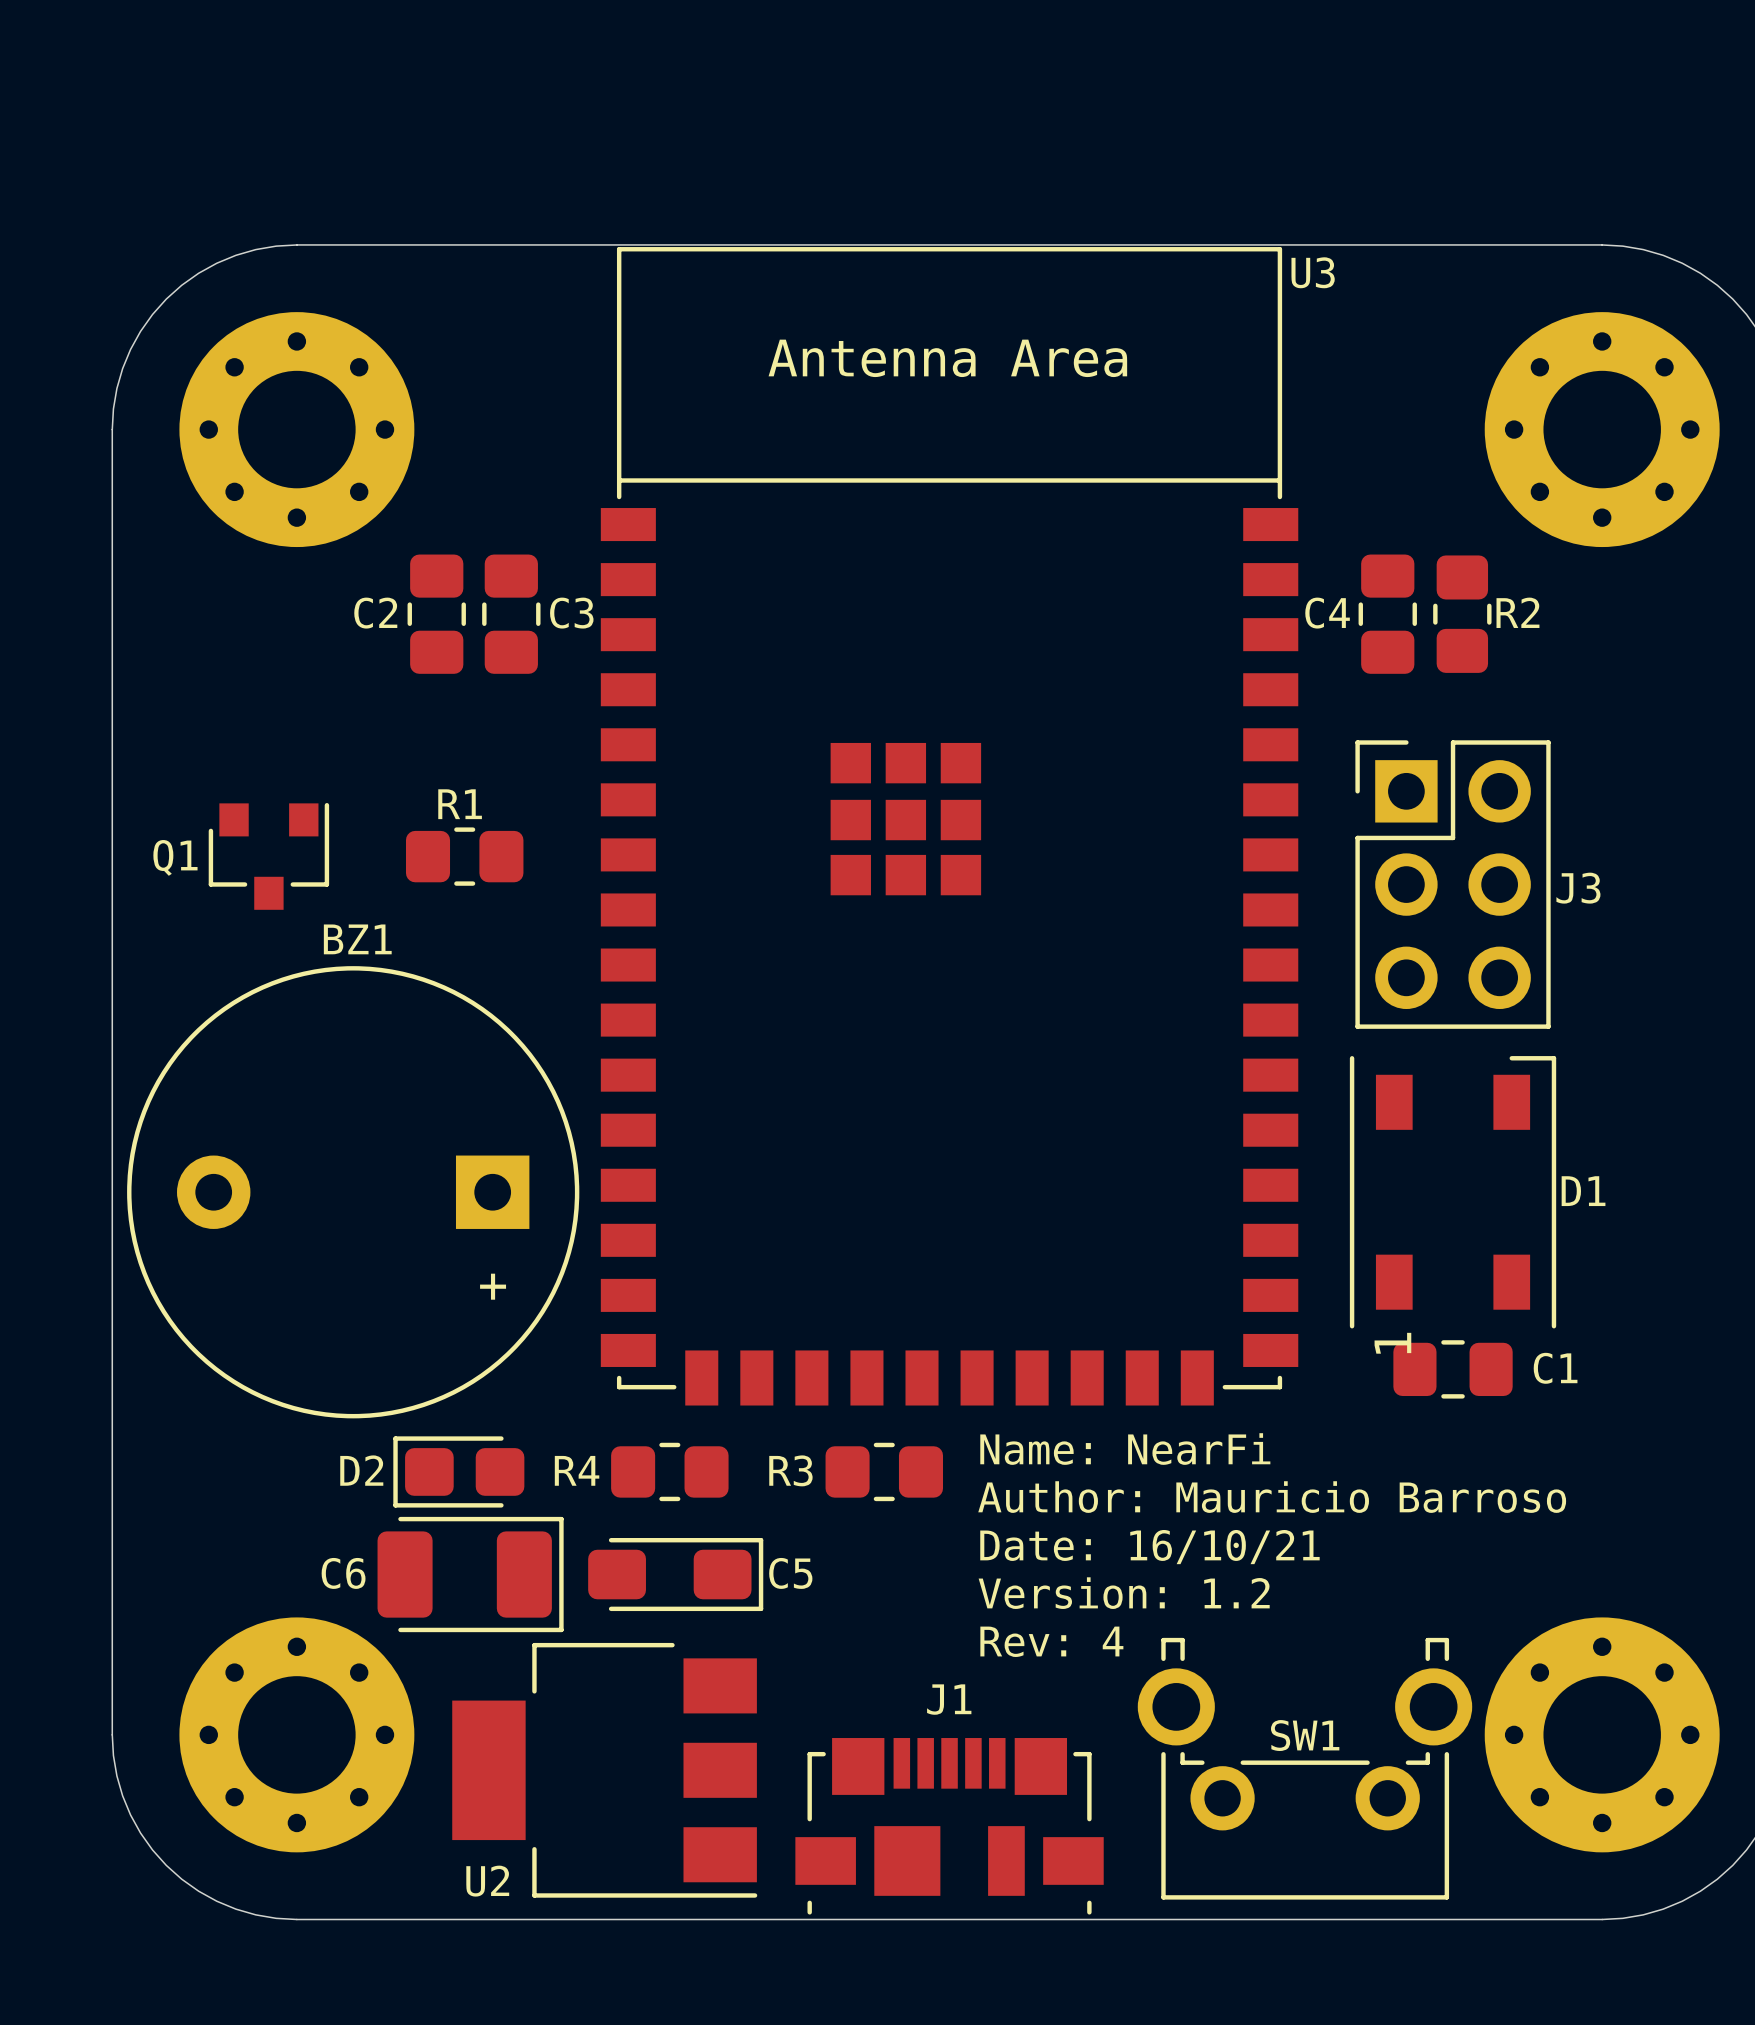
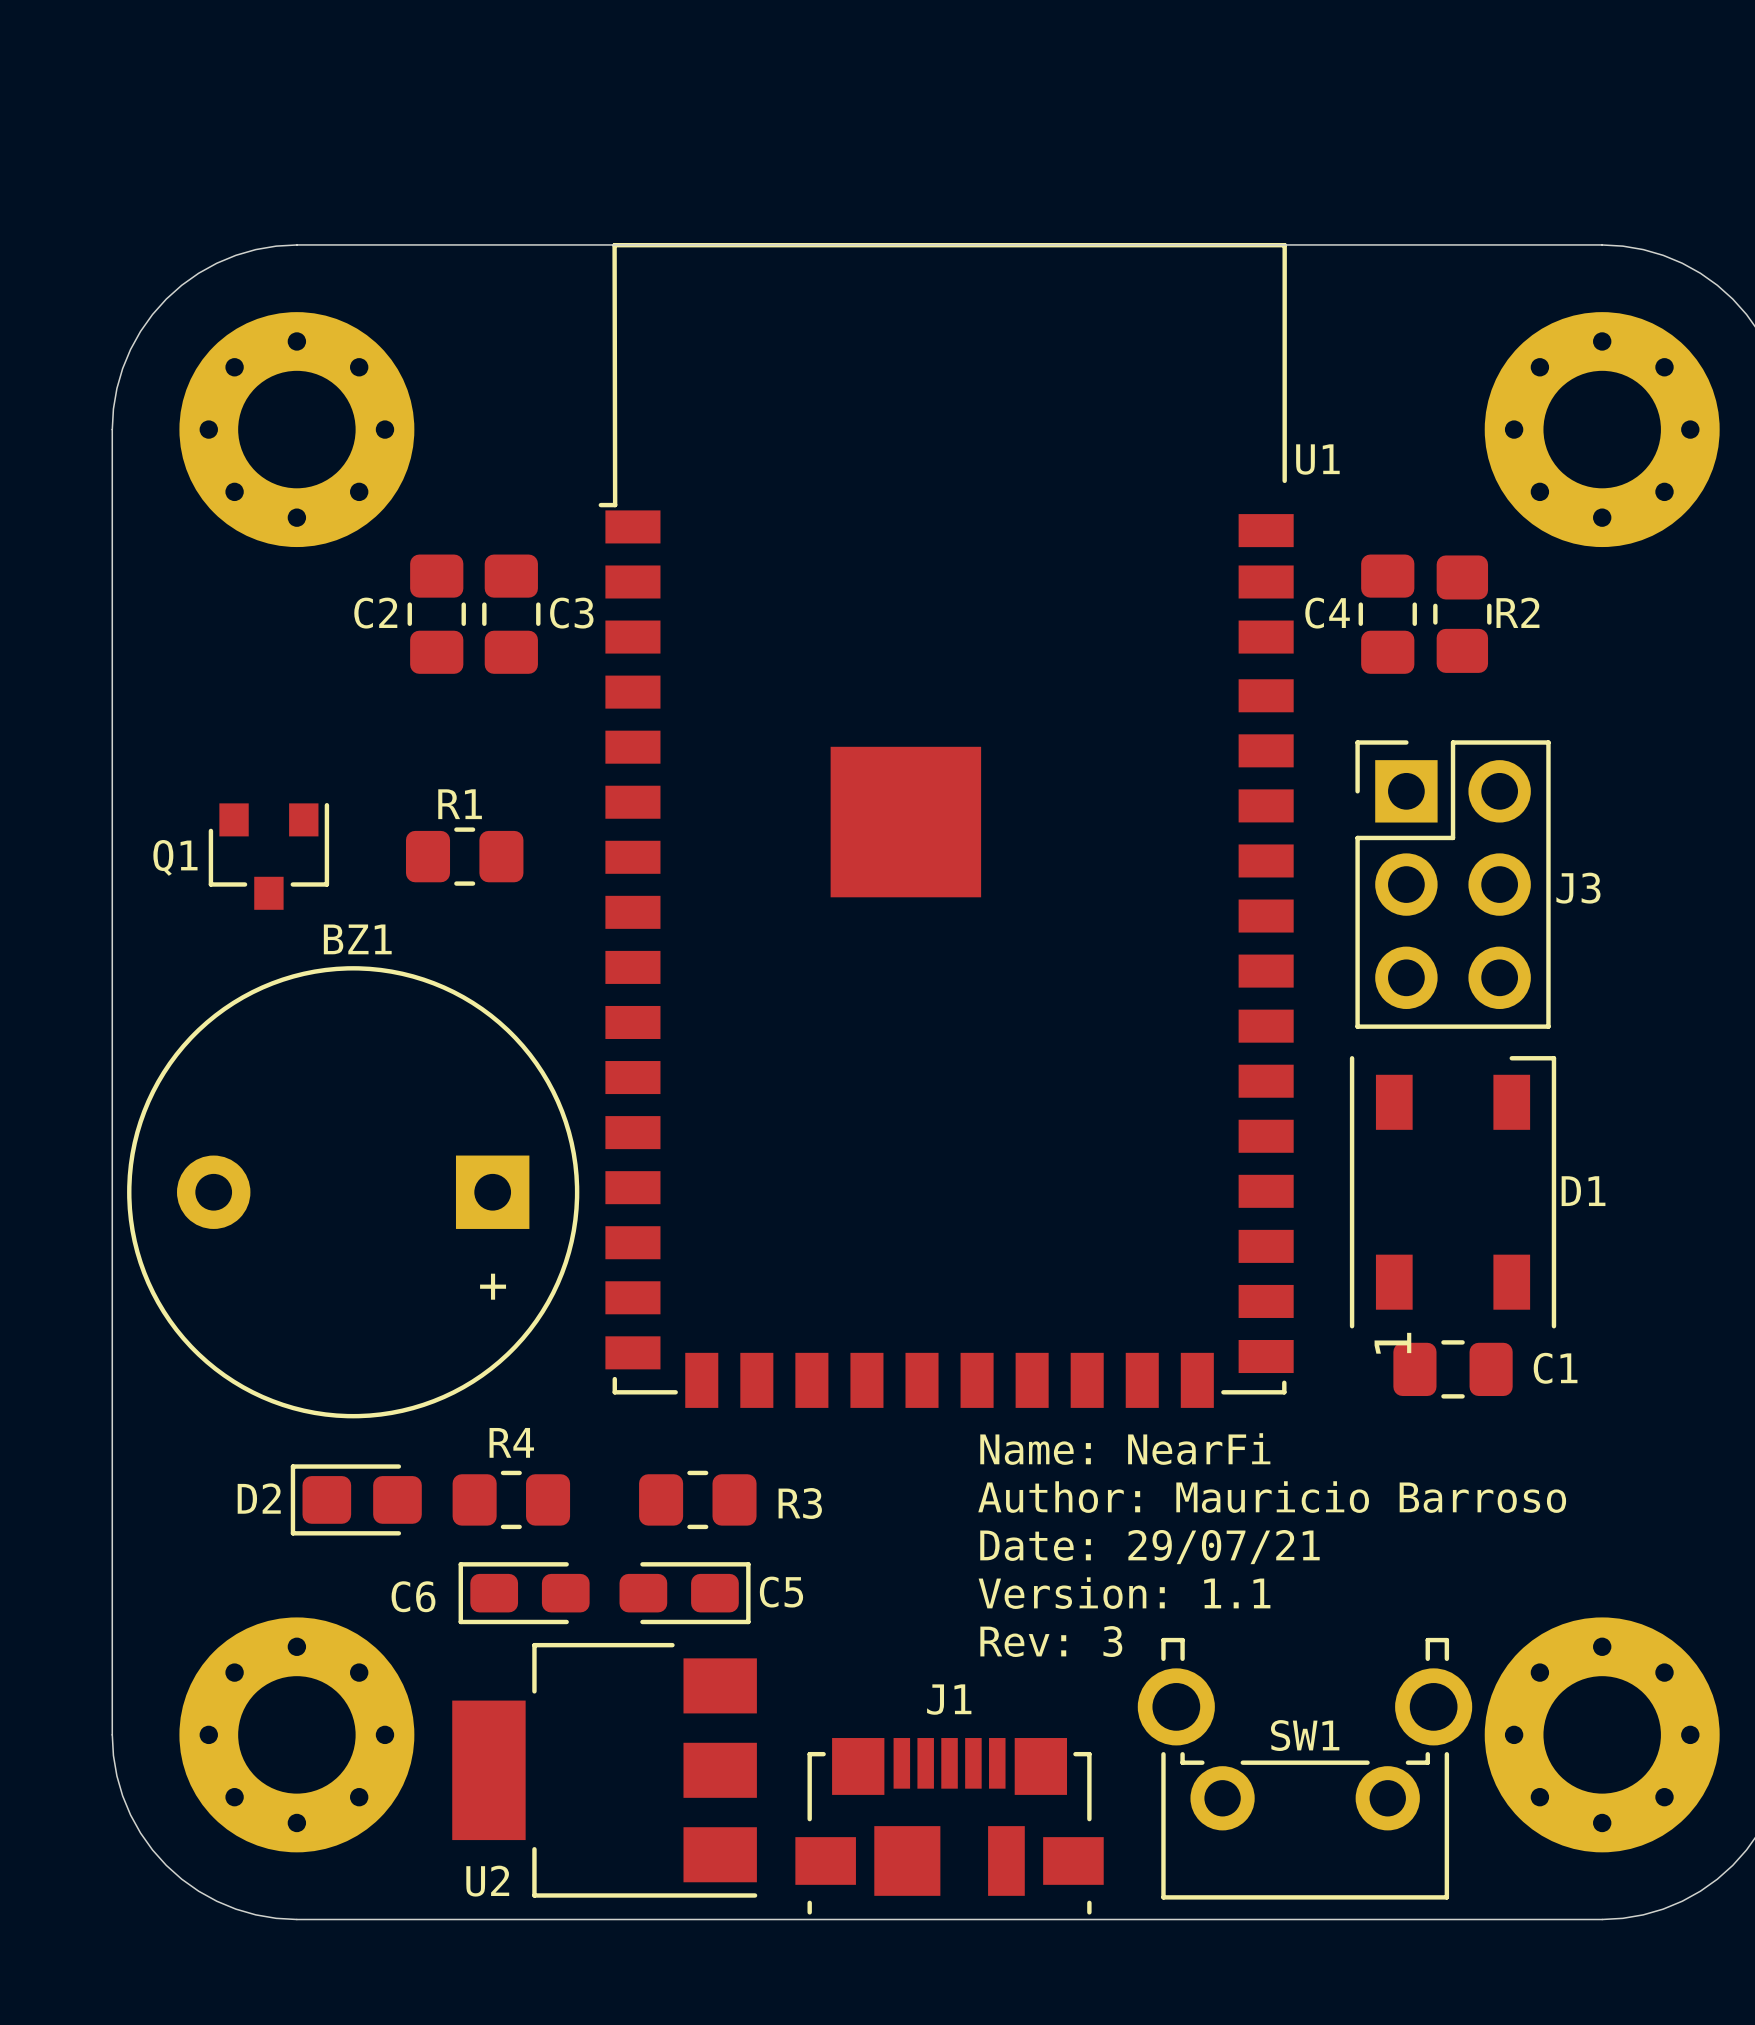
U1: none -> (946, 825)
U3: (949, 826) -> none
R4 name position: R4 (577, 1470) -> R4 (511, 1442)
R3 name position: R3 (790, 1470) -> R3 (800, 1503)
D2 position: (458, 1471) -> (356, 1499)
R4 position: (669, 1471) -> (511, 1499)
R3 position: (884, 1471) -> (697, 1499)
C6 footprint: [377, 1516, 564, 1633] -> [458, 1562, 590, 1625]
C5 footprint: [588, 1538, 764, 1612] -> [619, 1562, 751, 1625]
text: Date: 16/10/21 (1149, 1547) -> Date: 29/07/21 (1149, 1547)
text: Version: 1.2 (1124, 1593) -> Version: 1.1 (1124, 1593)
text: Rev: 4 (1051, 1641) -> Rev: 3 (1051, 1641)

